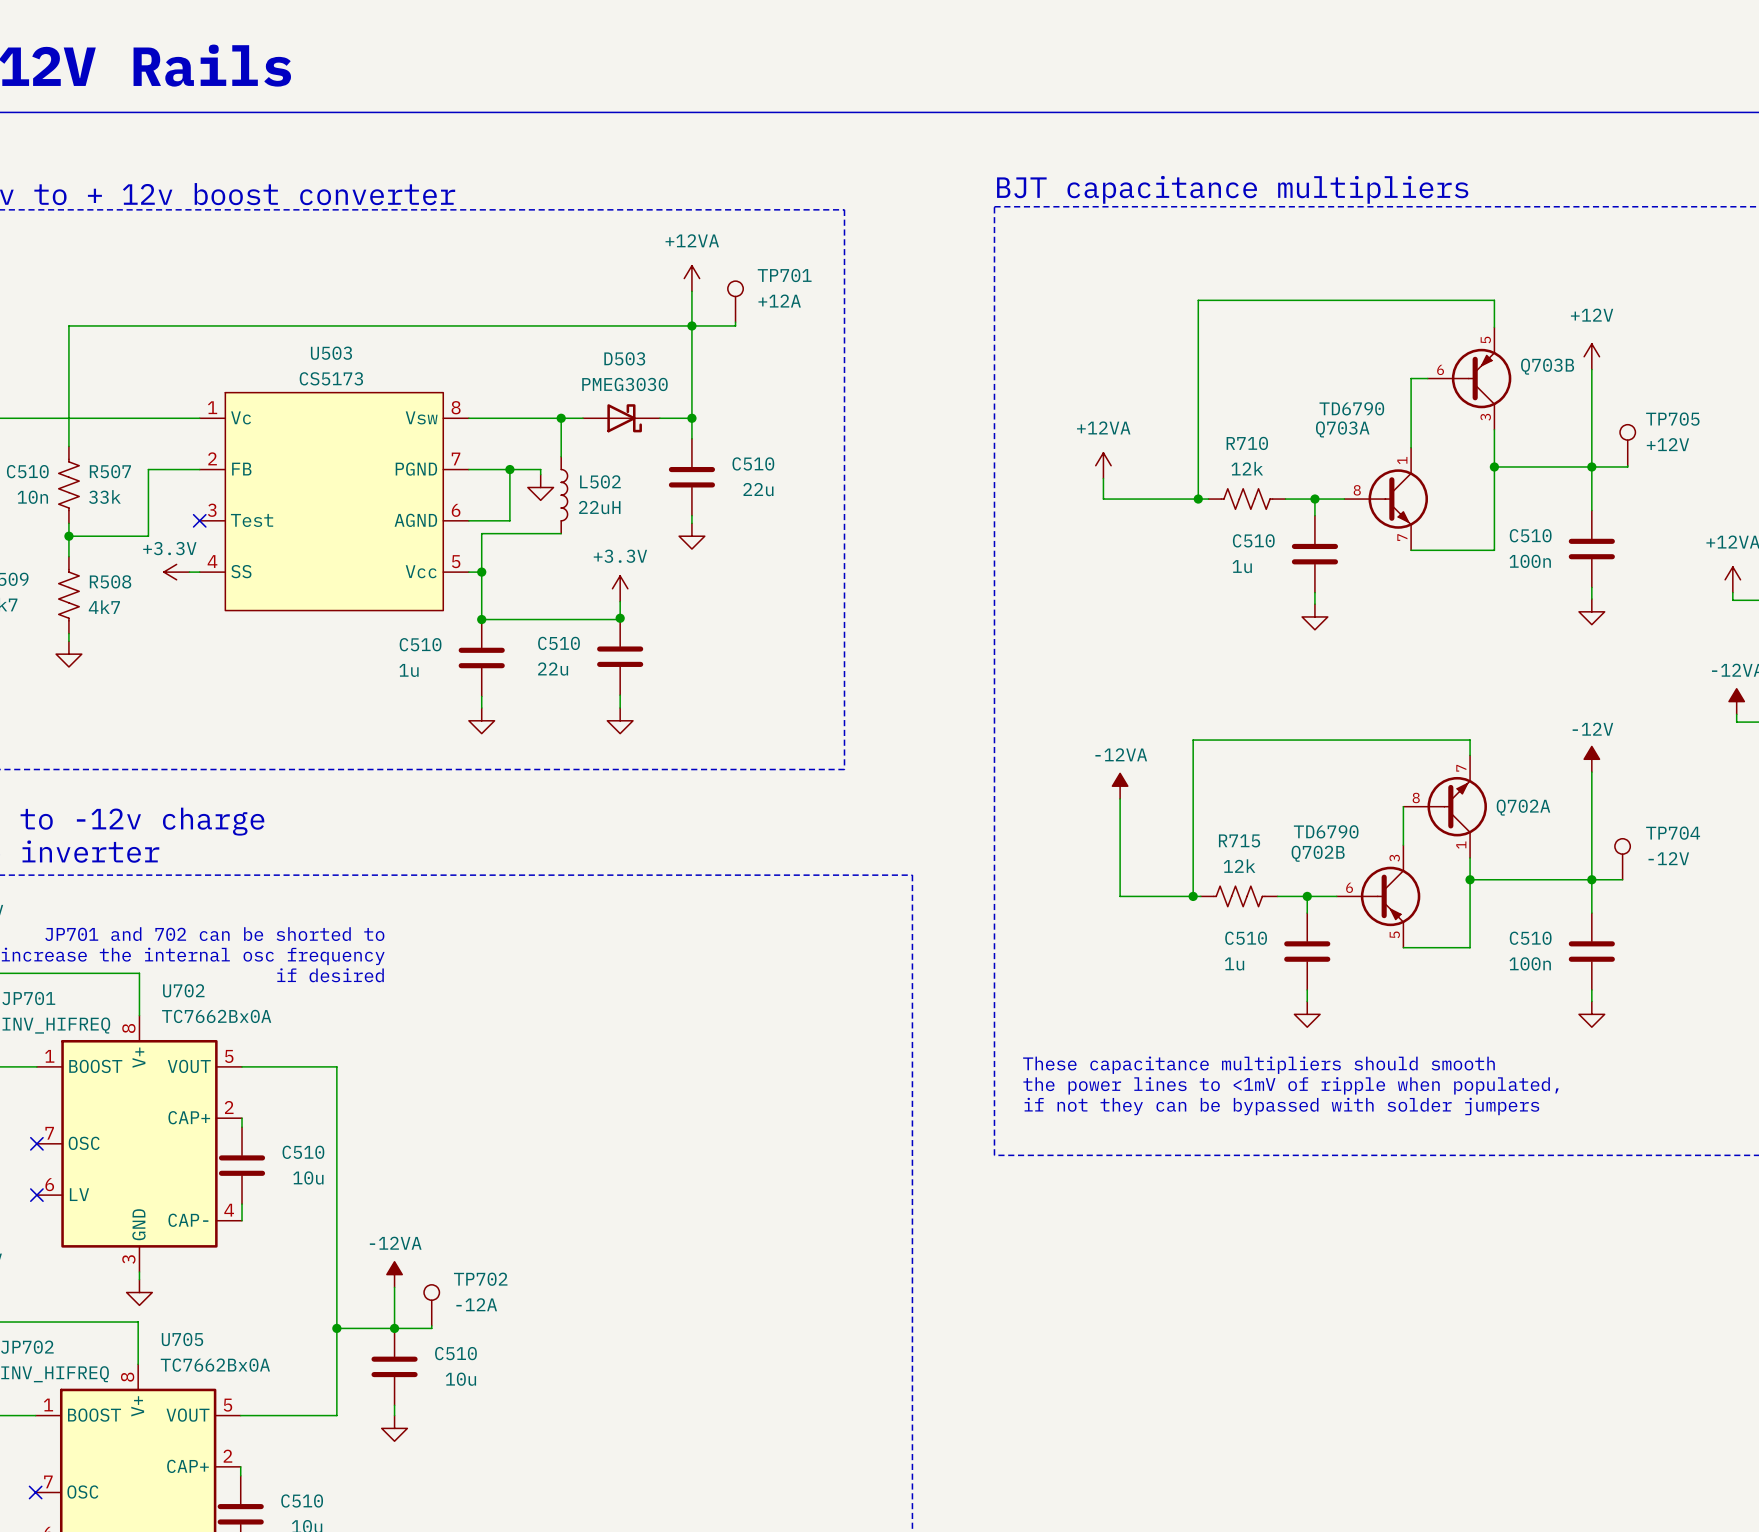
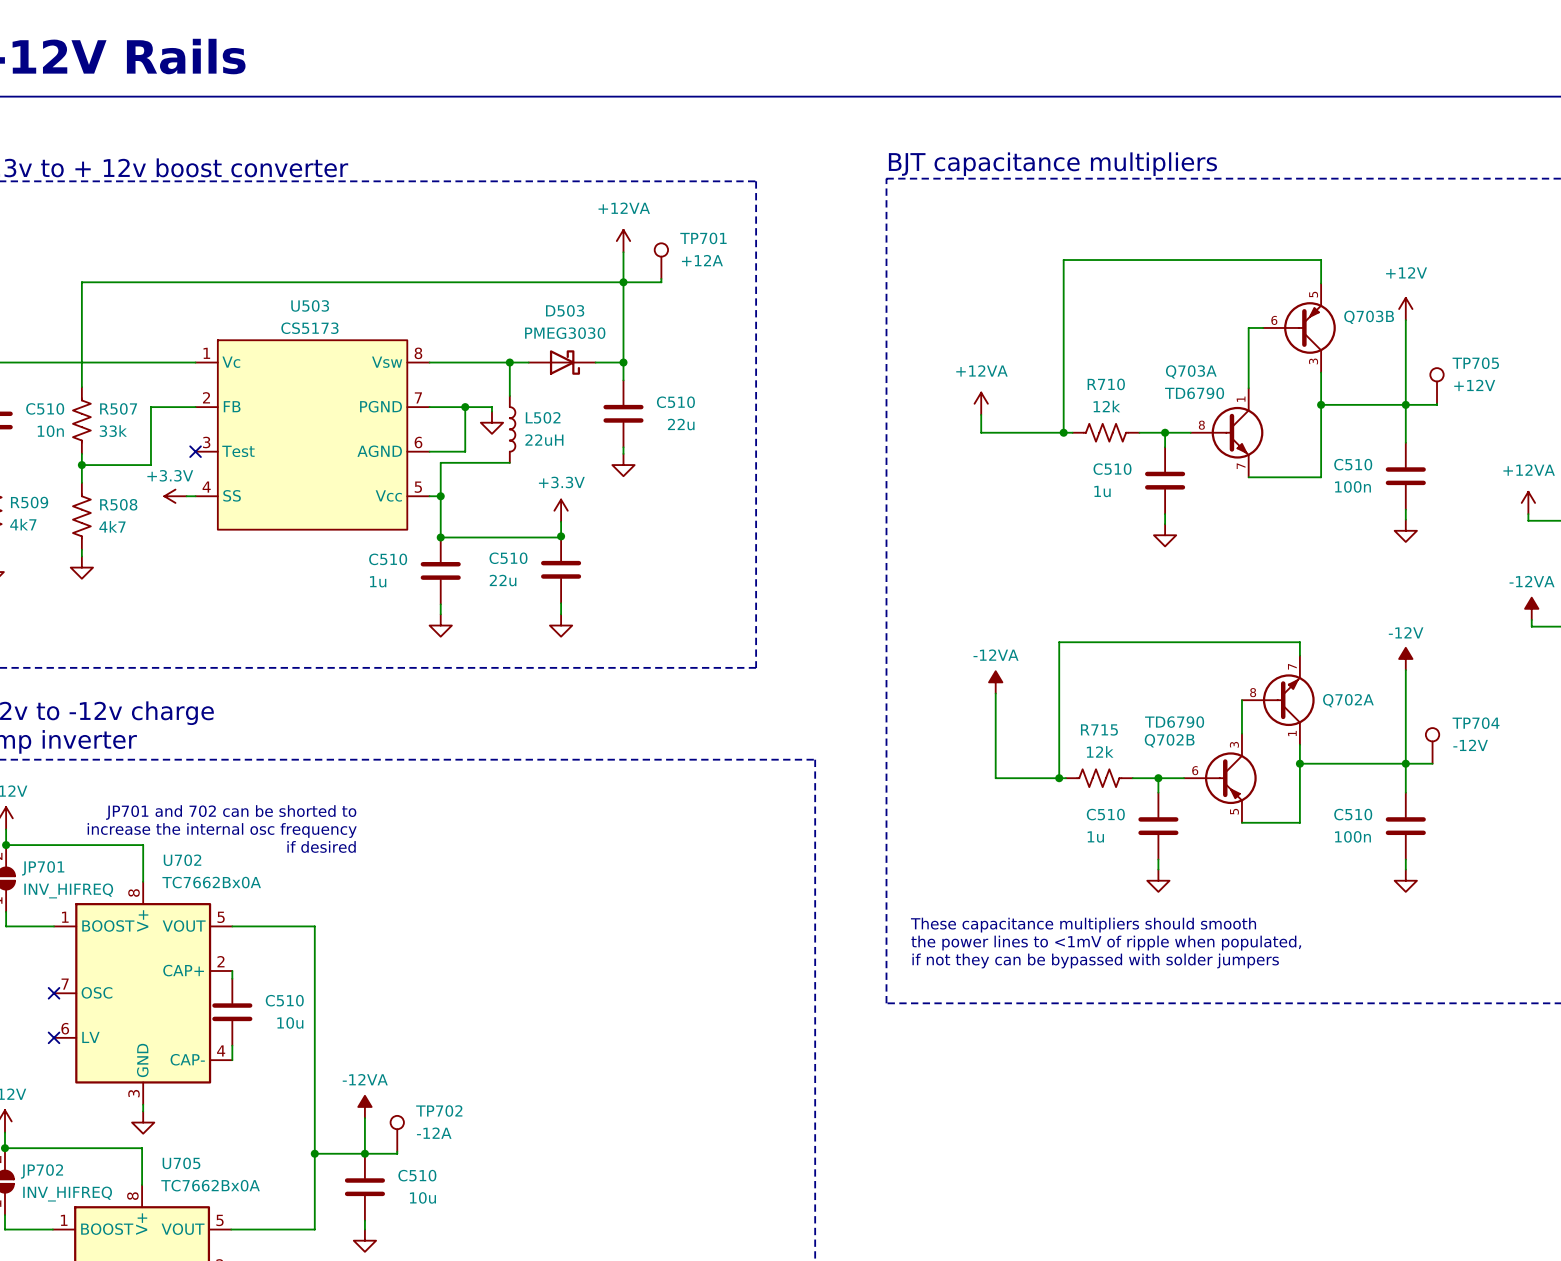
Q703A value position: TD6790 (1351, 408) -> TD6790 (1194, 393)

